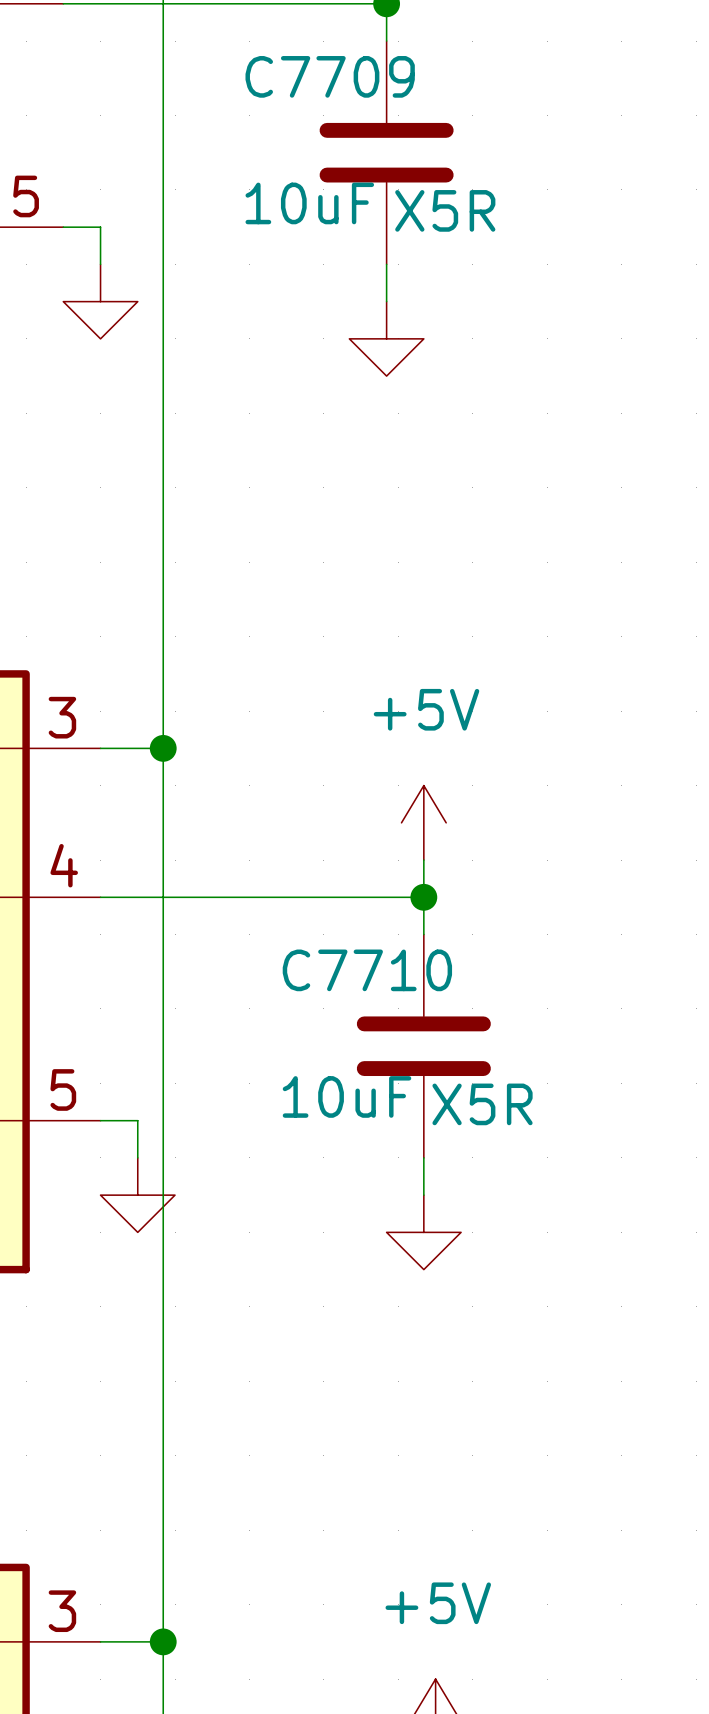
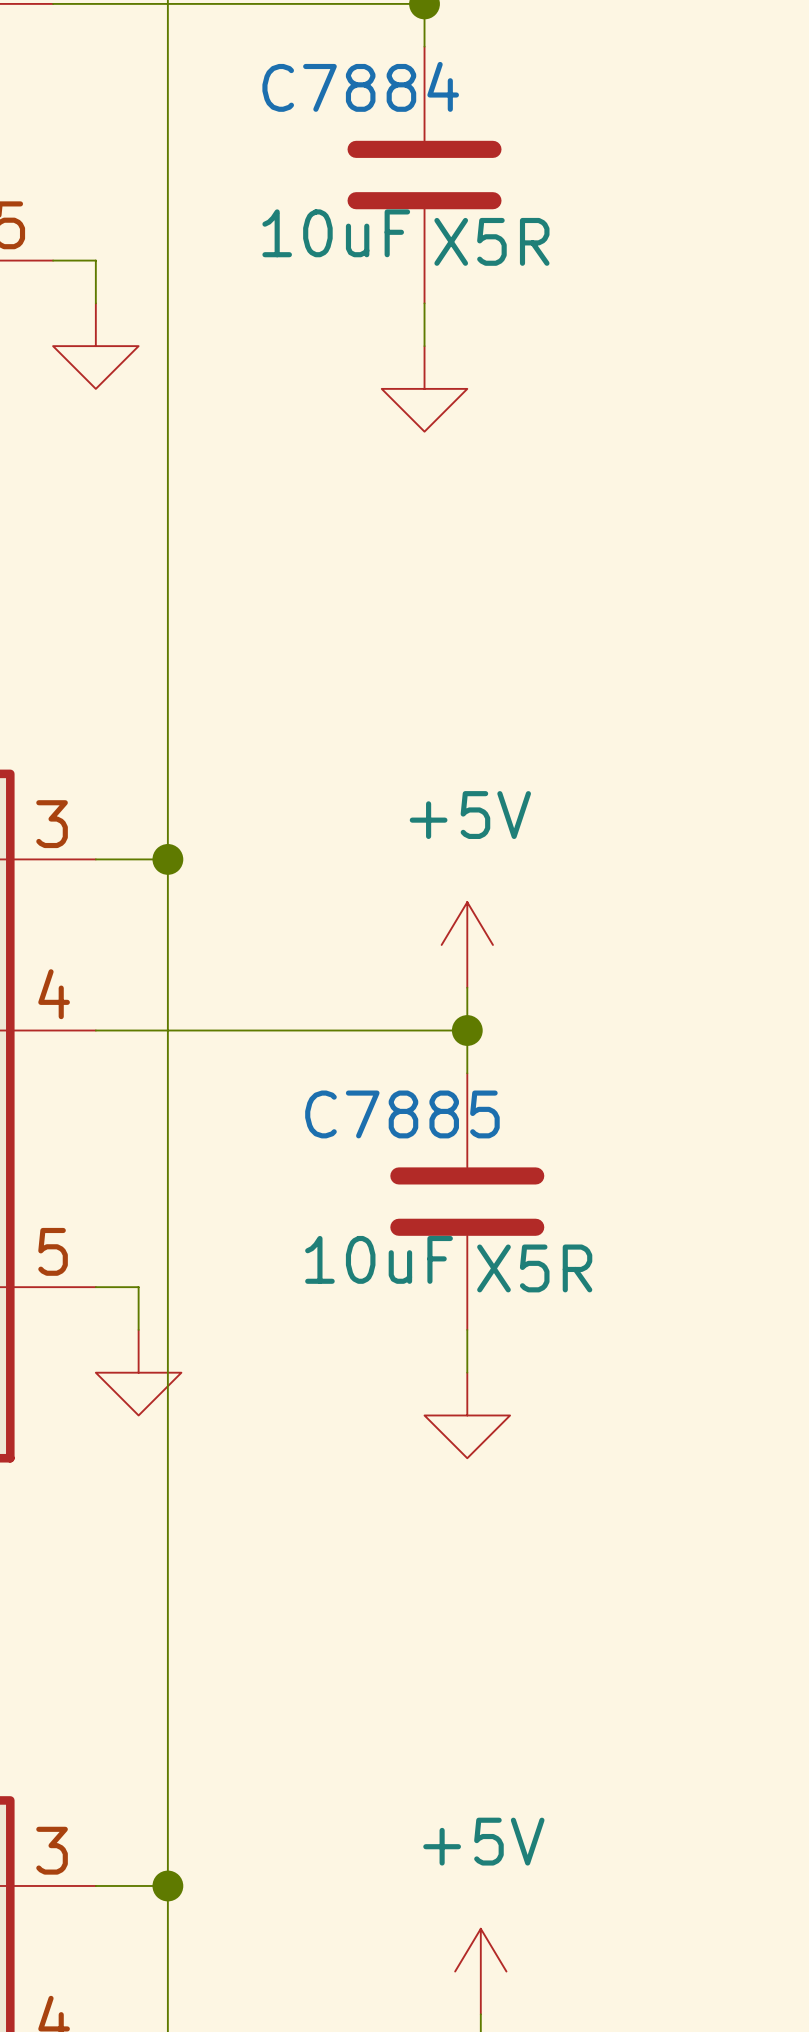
C7709 name: C7709 (330, 76) -> C7884 (360, 86)
C7710 name: C7710 (367, 970) -> C7885 (402, 1114)

